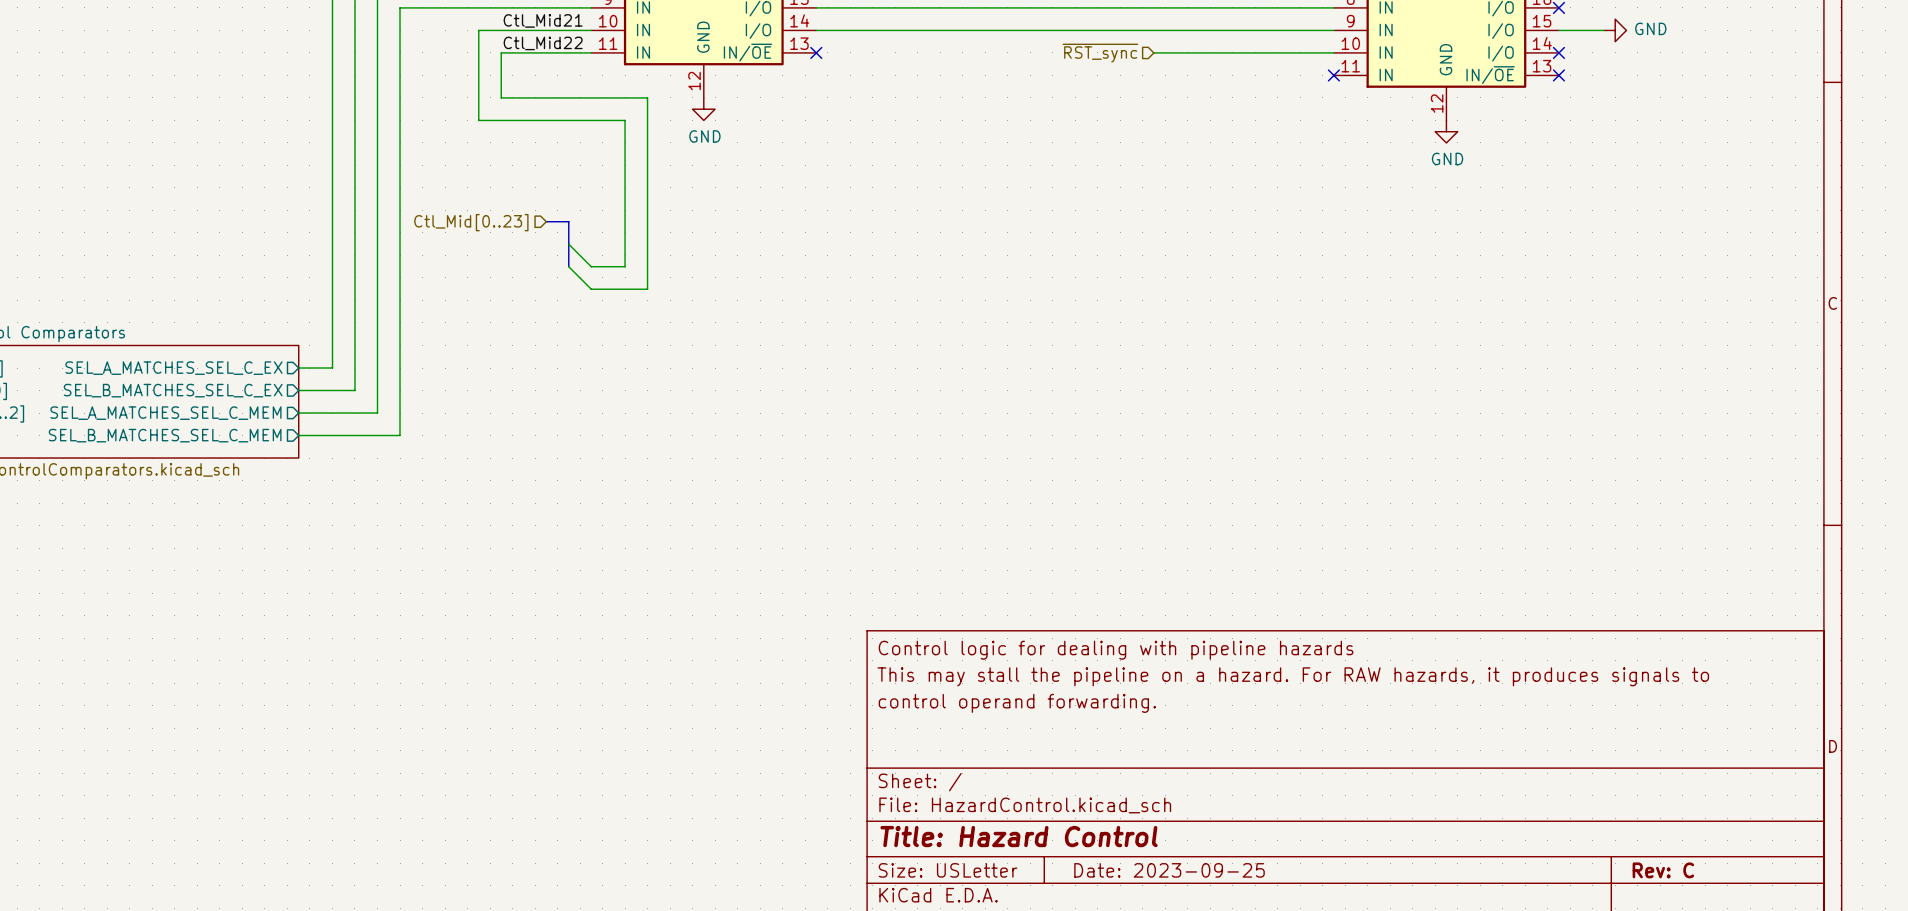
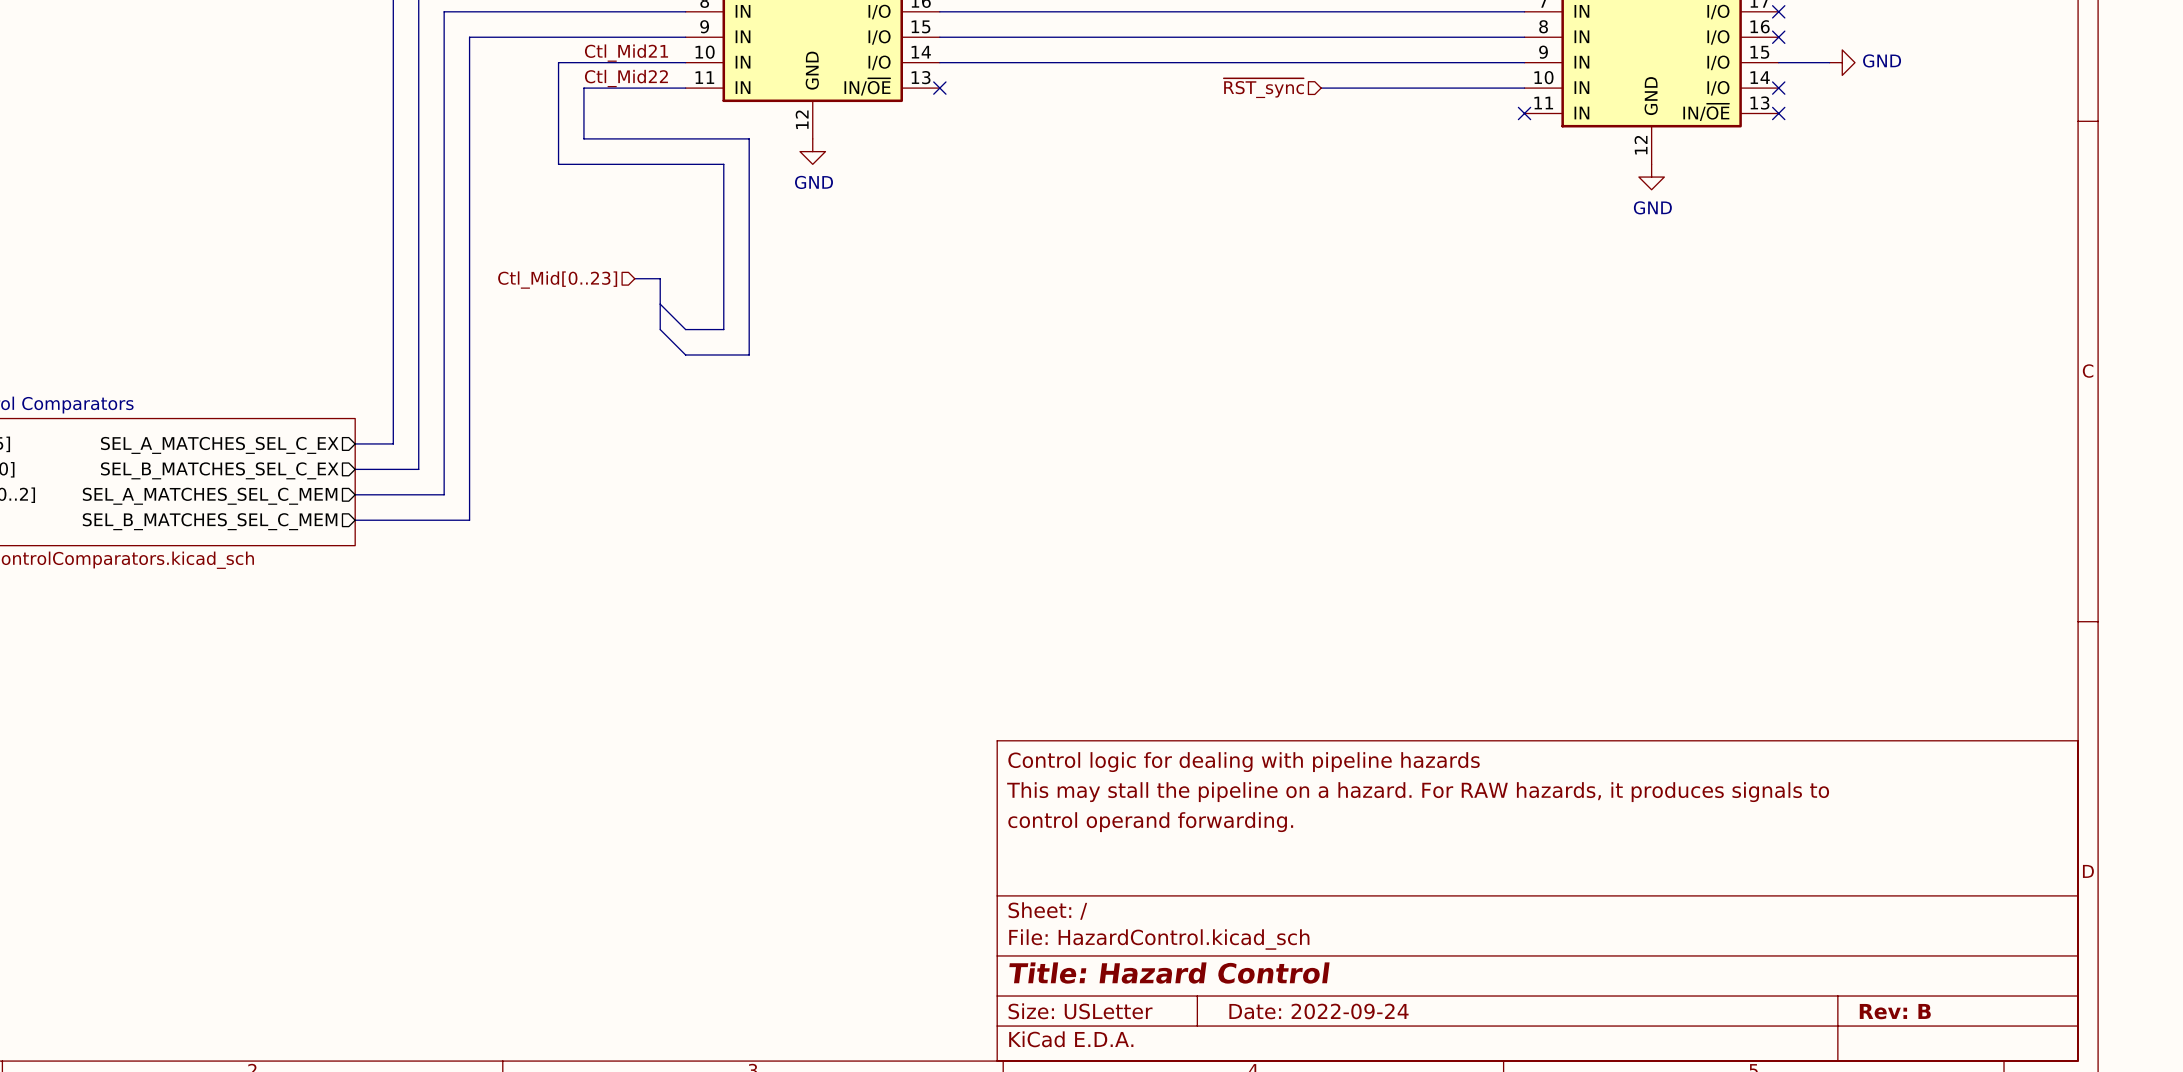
title block: Date: 2023-09-25 (1169, 870) -> Date: 2022-09-24 (1318, 1011)
title block: Rev: C (1663, 870) -> Rev: B (1895, 1011)

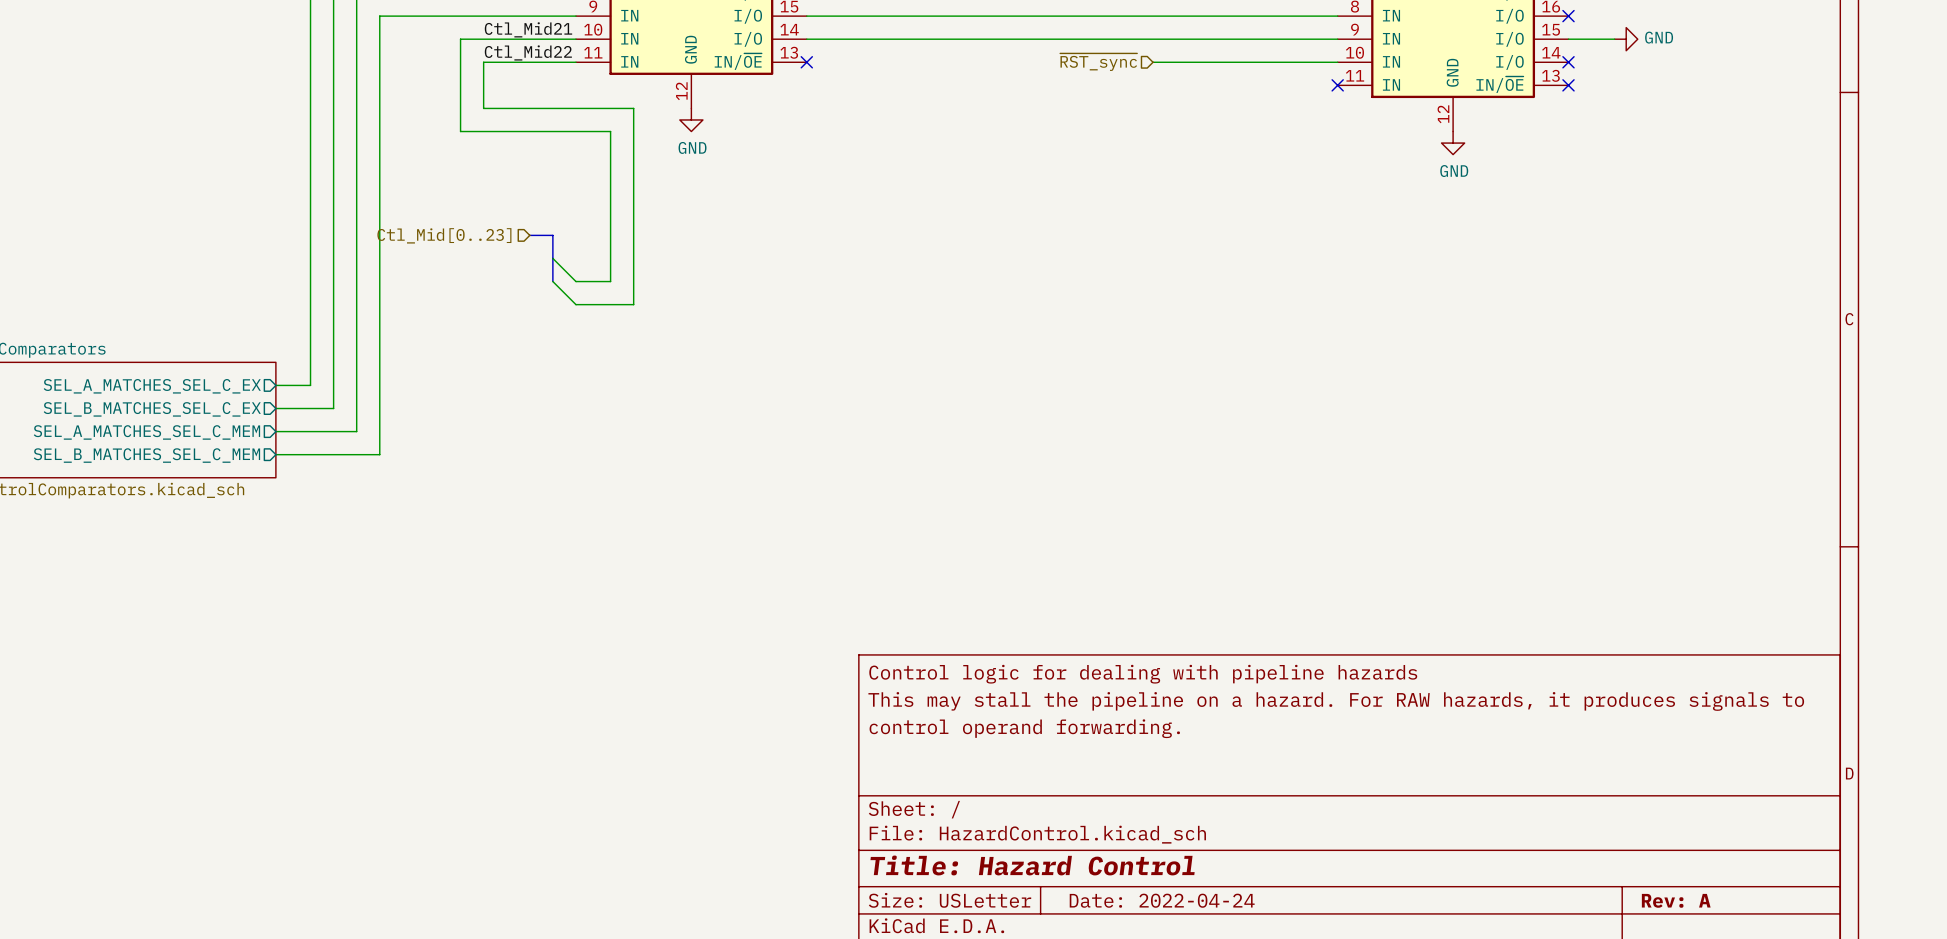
title block: Date: 2022-09-24 (1318, 1011) -> Date: 2022-04-24 (1162, 900)
title block: Rev: B (1895, 1011) -> Rev: A (1676, 900)

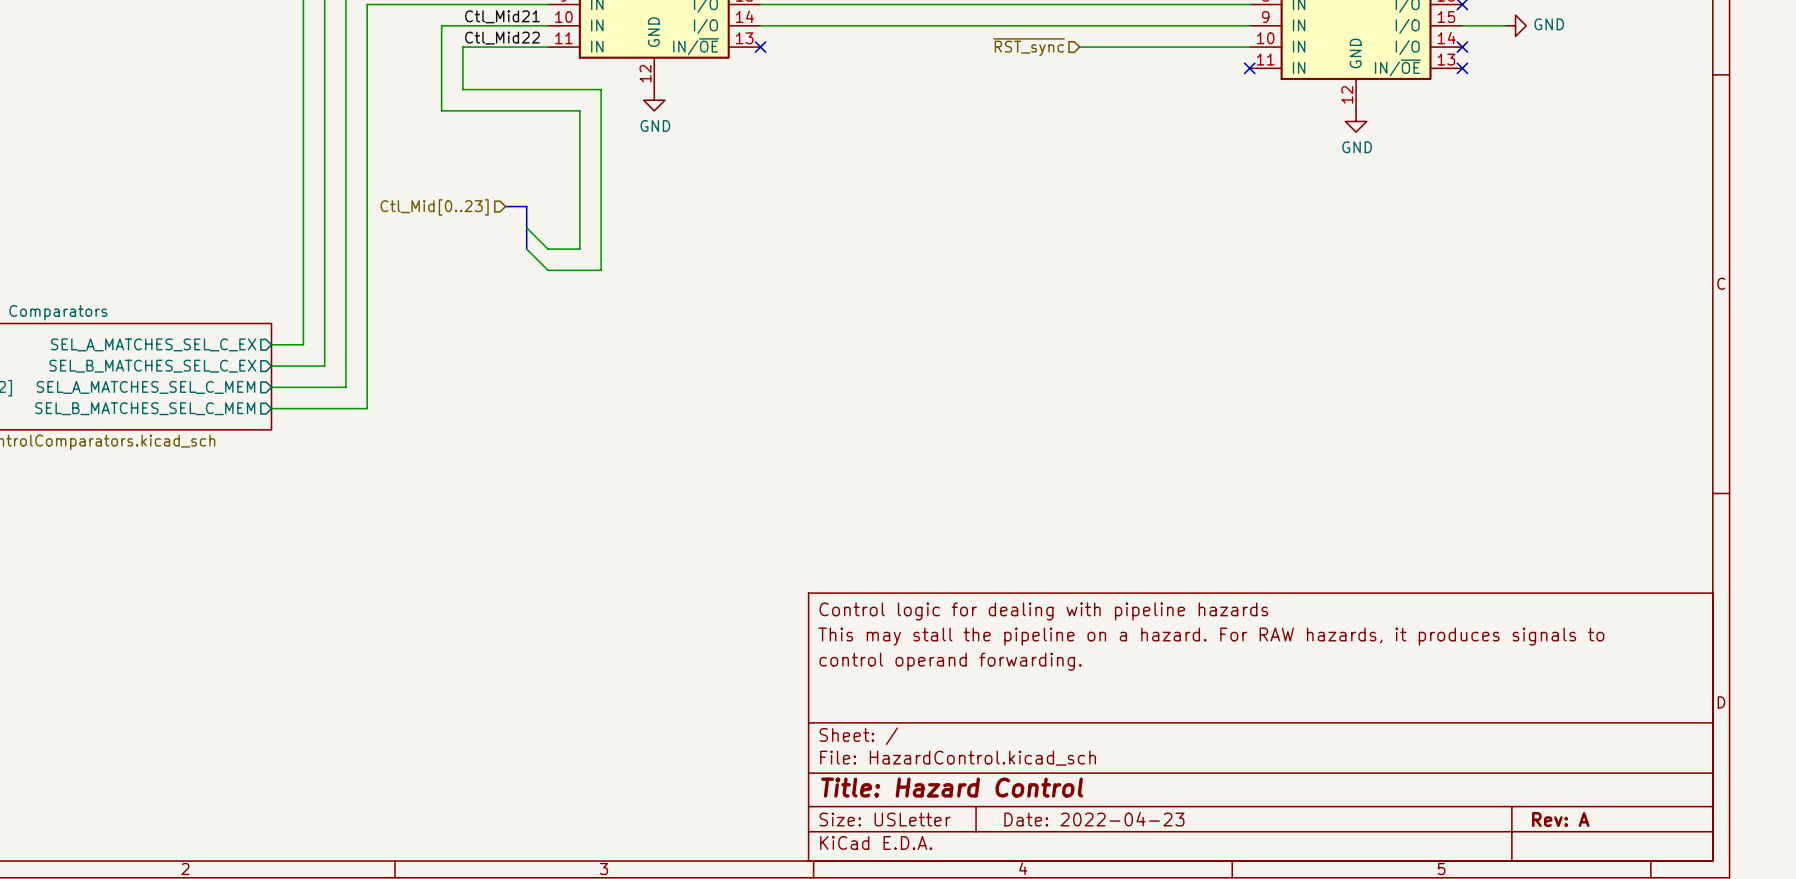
title block: Date: 2022-04-24 (1162, 900) -> Date: 2022-04-23 (1094, 819)

